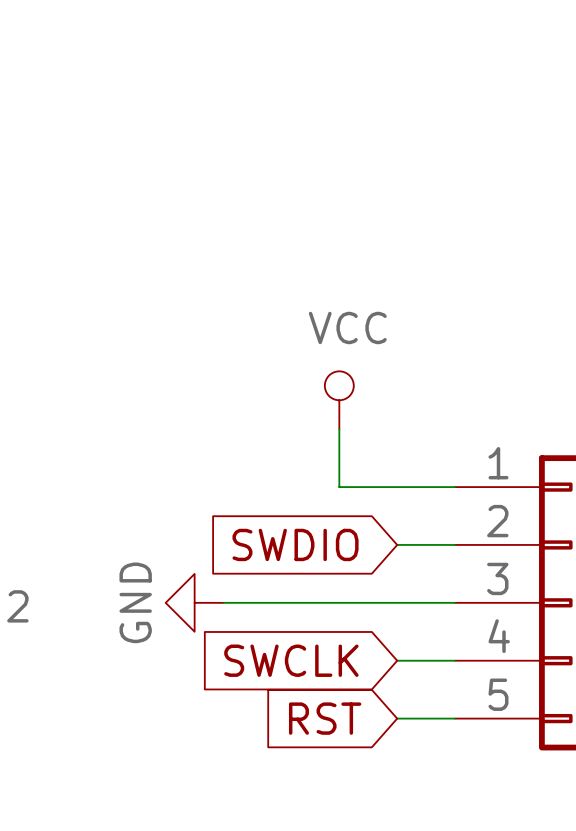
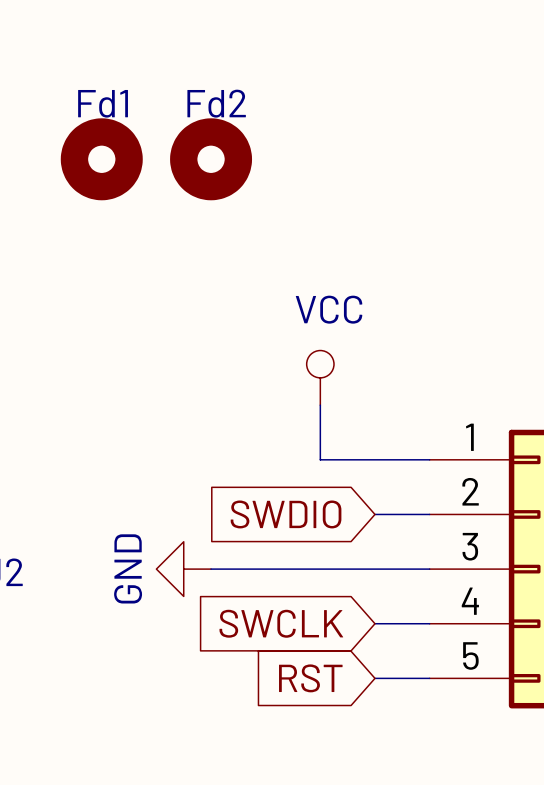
Fd1: none -> (101, 159)
Fd2: none -> (211, 159)

